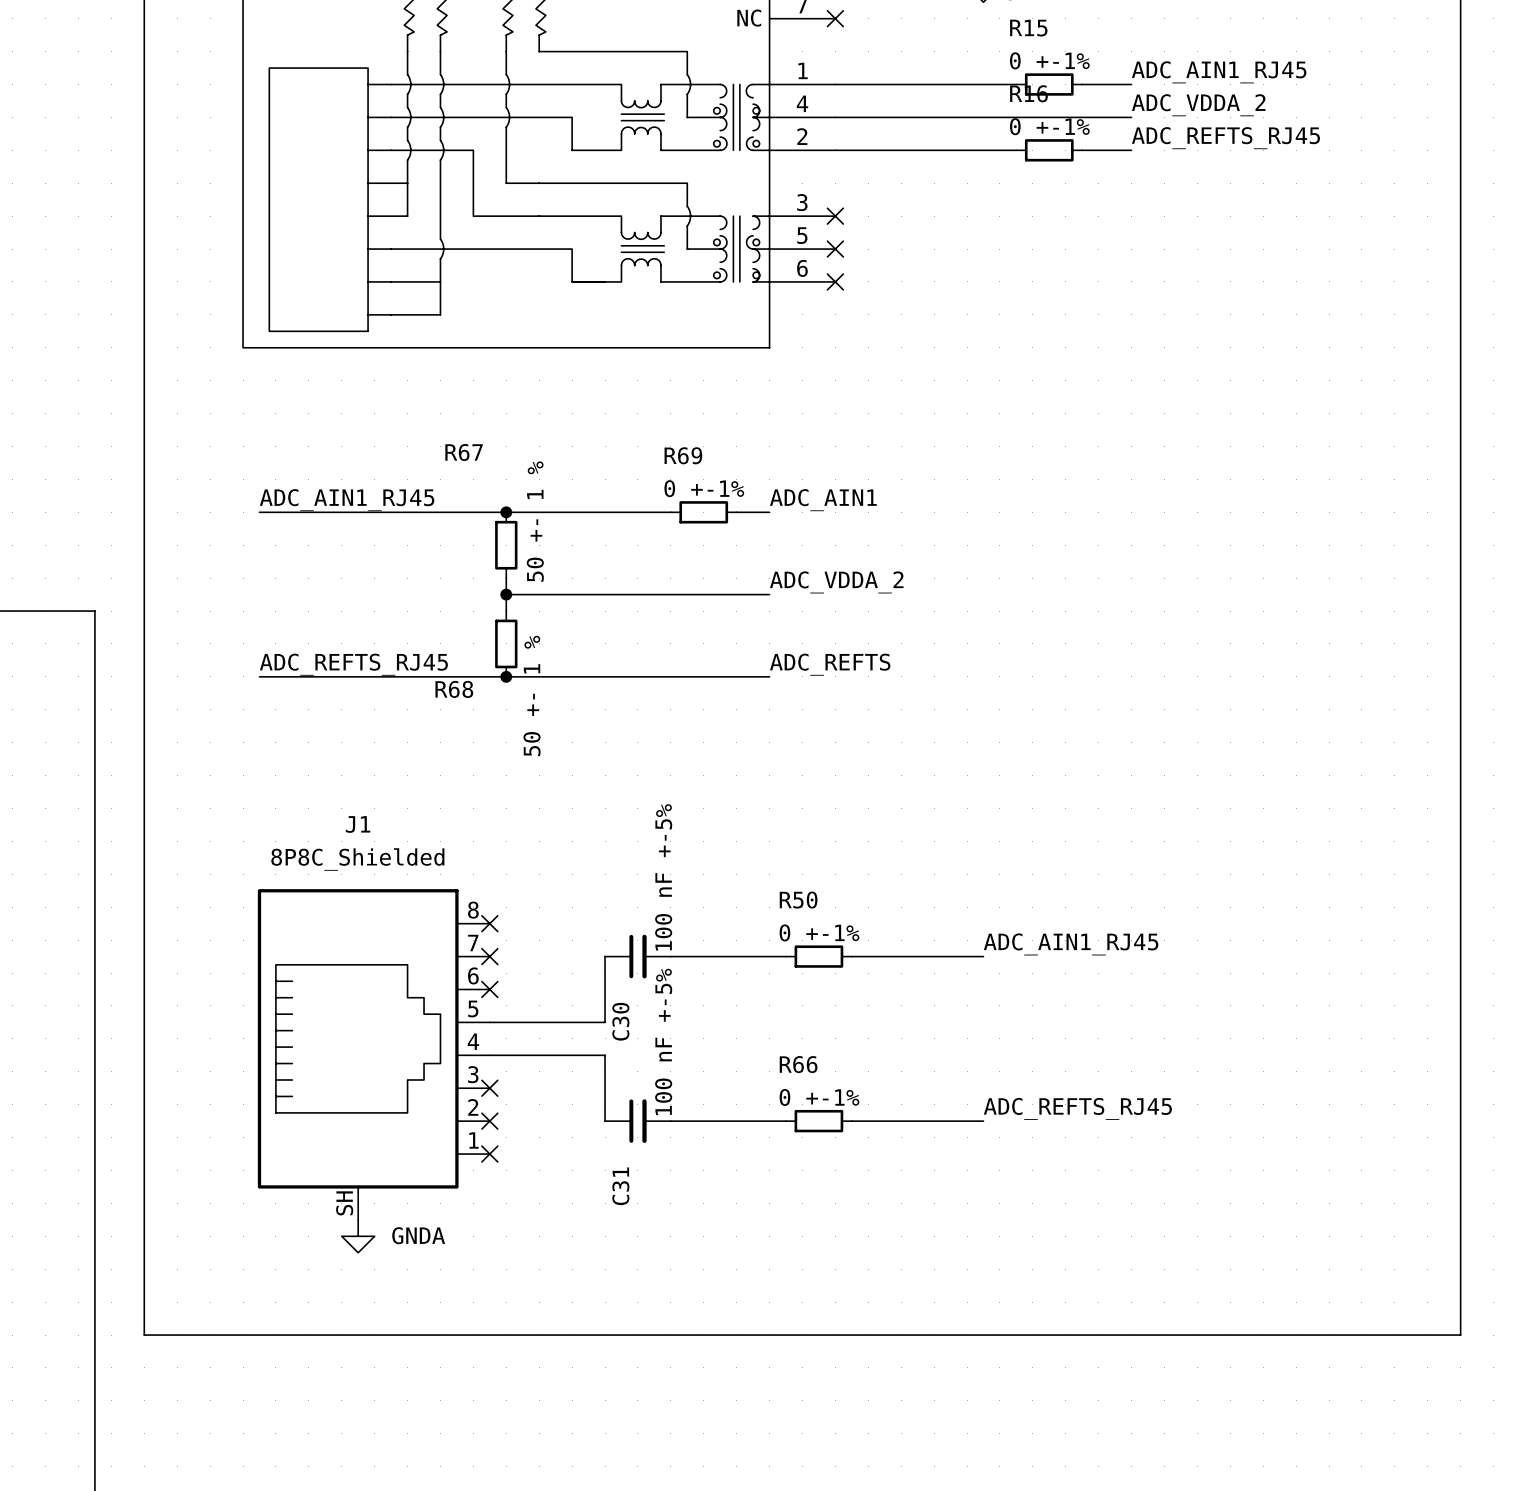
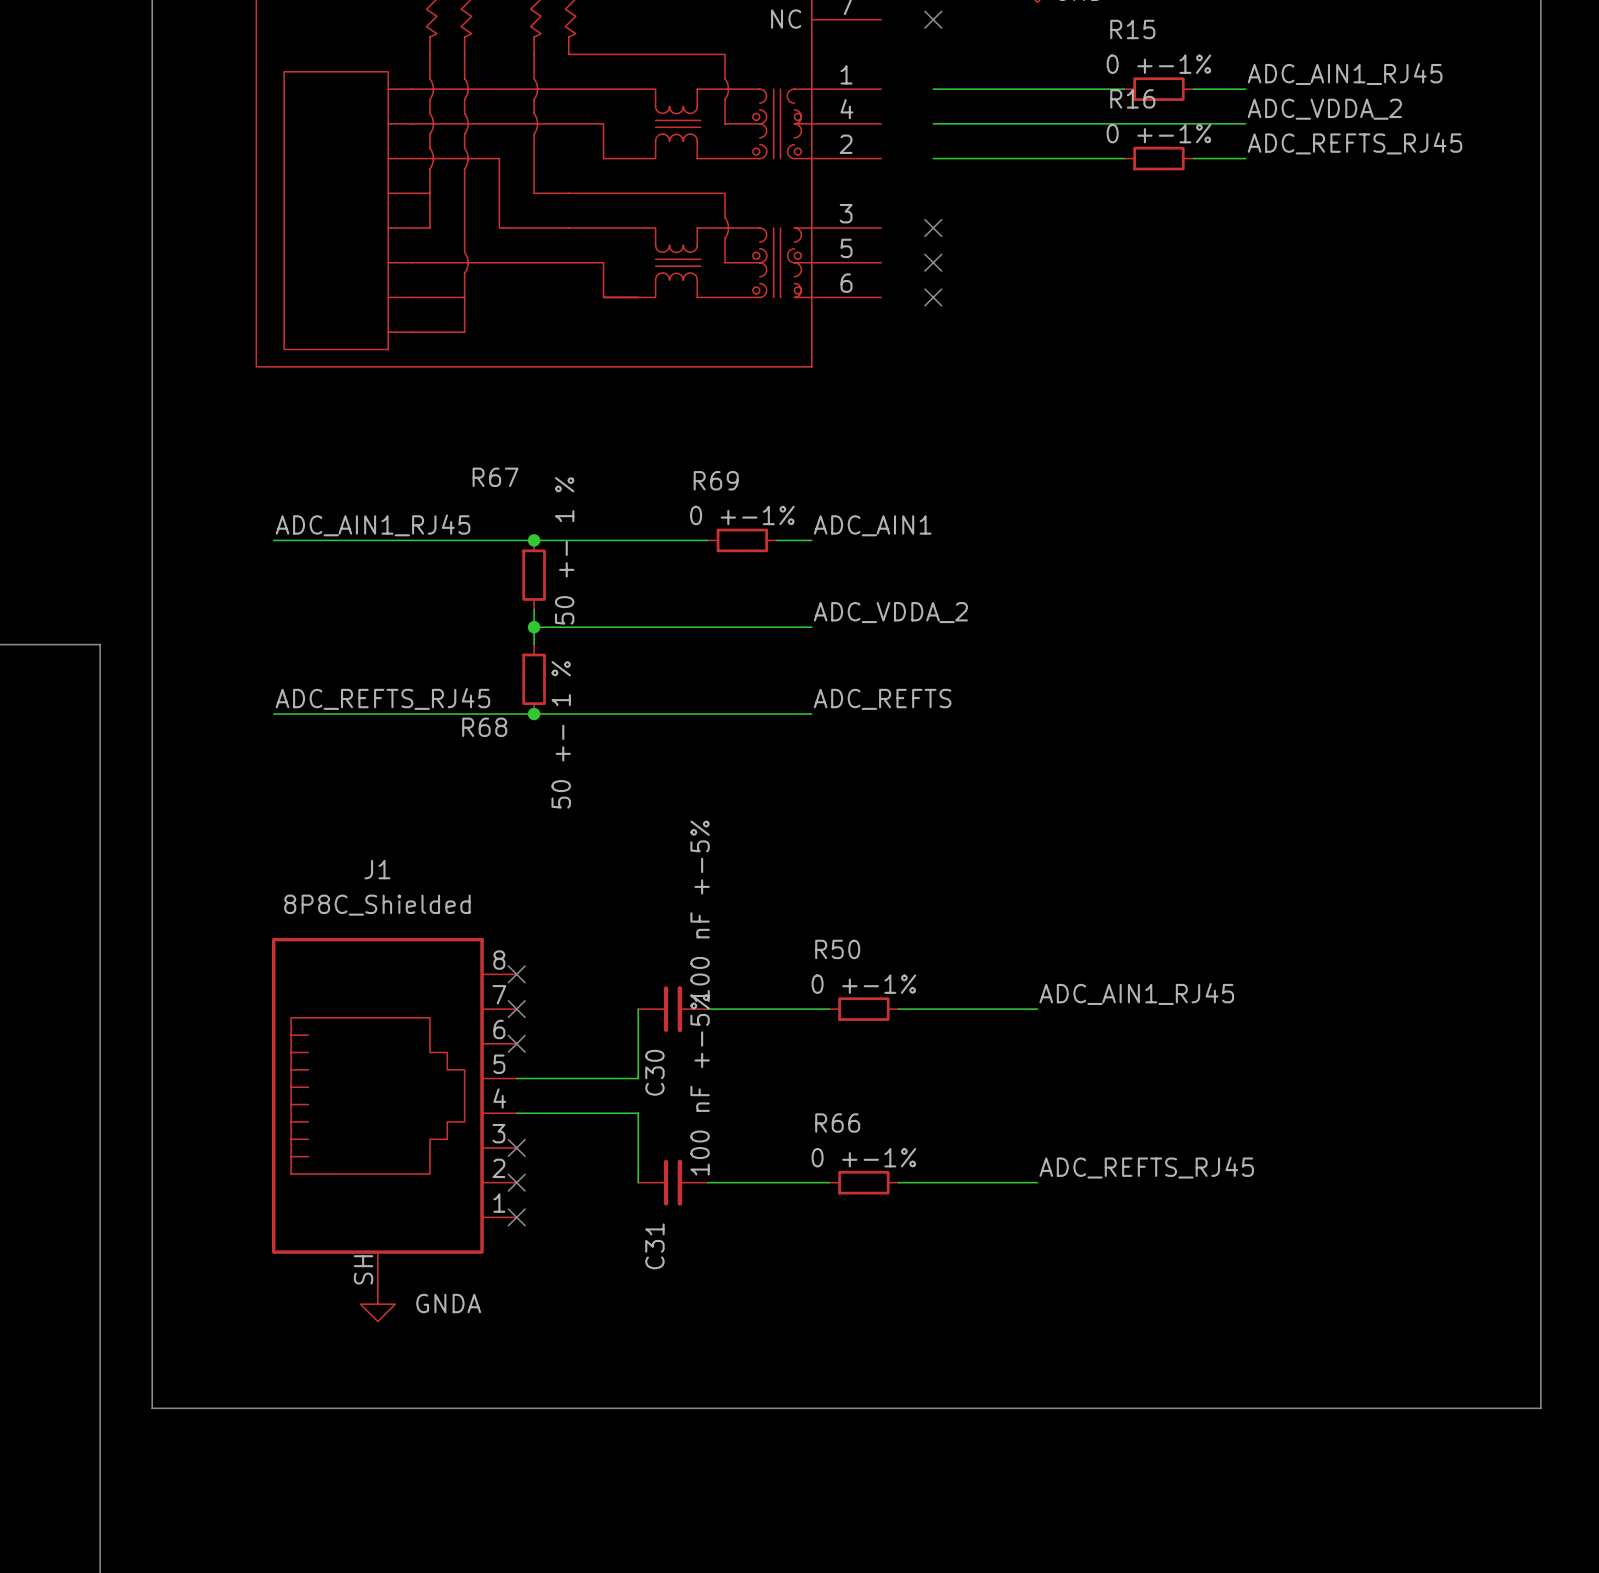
no-connect mark position: (835, 18) -> (933, 19)
label position: ADC_AIN1_RJ45 (1219, 72) -> ADC_AIN1_RJ45 (1345, 74)
wire: (835, 84) (884, 84) -> (1072, 89) (1124, 89)
R15 position: (1049, 84) -> (1158, 89)
wire: (1082, 84) (1131, 84) -> (1245, 89) (1193, 89)
label position: ADC_VDDA_2 (1198, 105) -> ADC_VDDA_2 (1324, 109)
wire: (835, 117) (884, 117) -> (1193, 123) (1245, 123)
label position: ADC_REFTS_RJ45 (1225, 138) -> ADC_REFTS_RJ45 (1354, 143)
wire: (835, 150) (884, 150) -> (1072, 158) (1124, 158)
R16 position: (1049, 150) -> (1158, 158)
wire: (1082, 150) (1131, 150) -> (1245, 158) (1193, 158)
no-connect mark: (835, 216) -> none
no-connect mark: none -> (933, 228)
no-connect mark: (835, 249) -> none
no-connect mark: none -> (933, 262)
no-connect mark: (835, 281) -> none
no-connect mark: none -> (933, 297)

